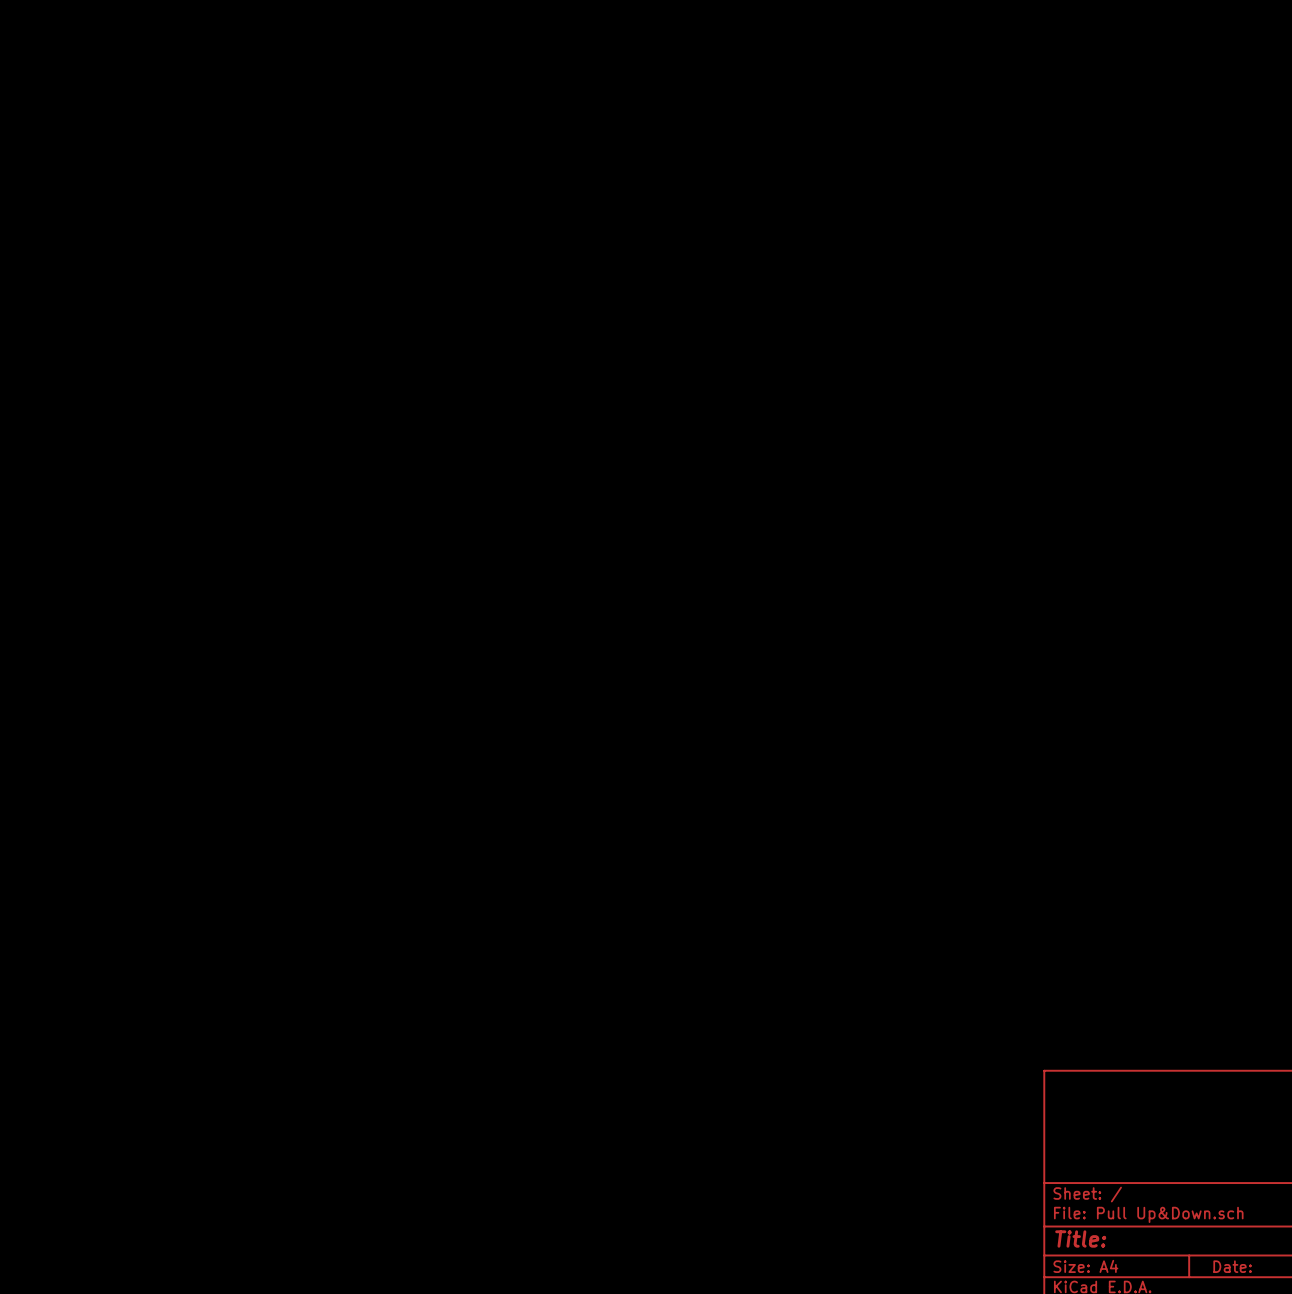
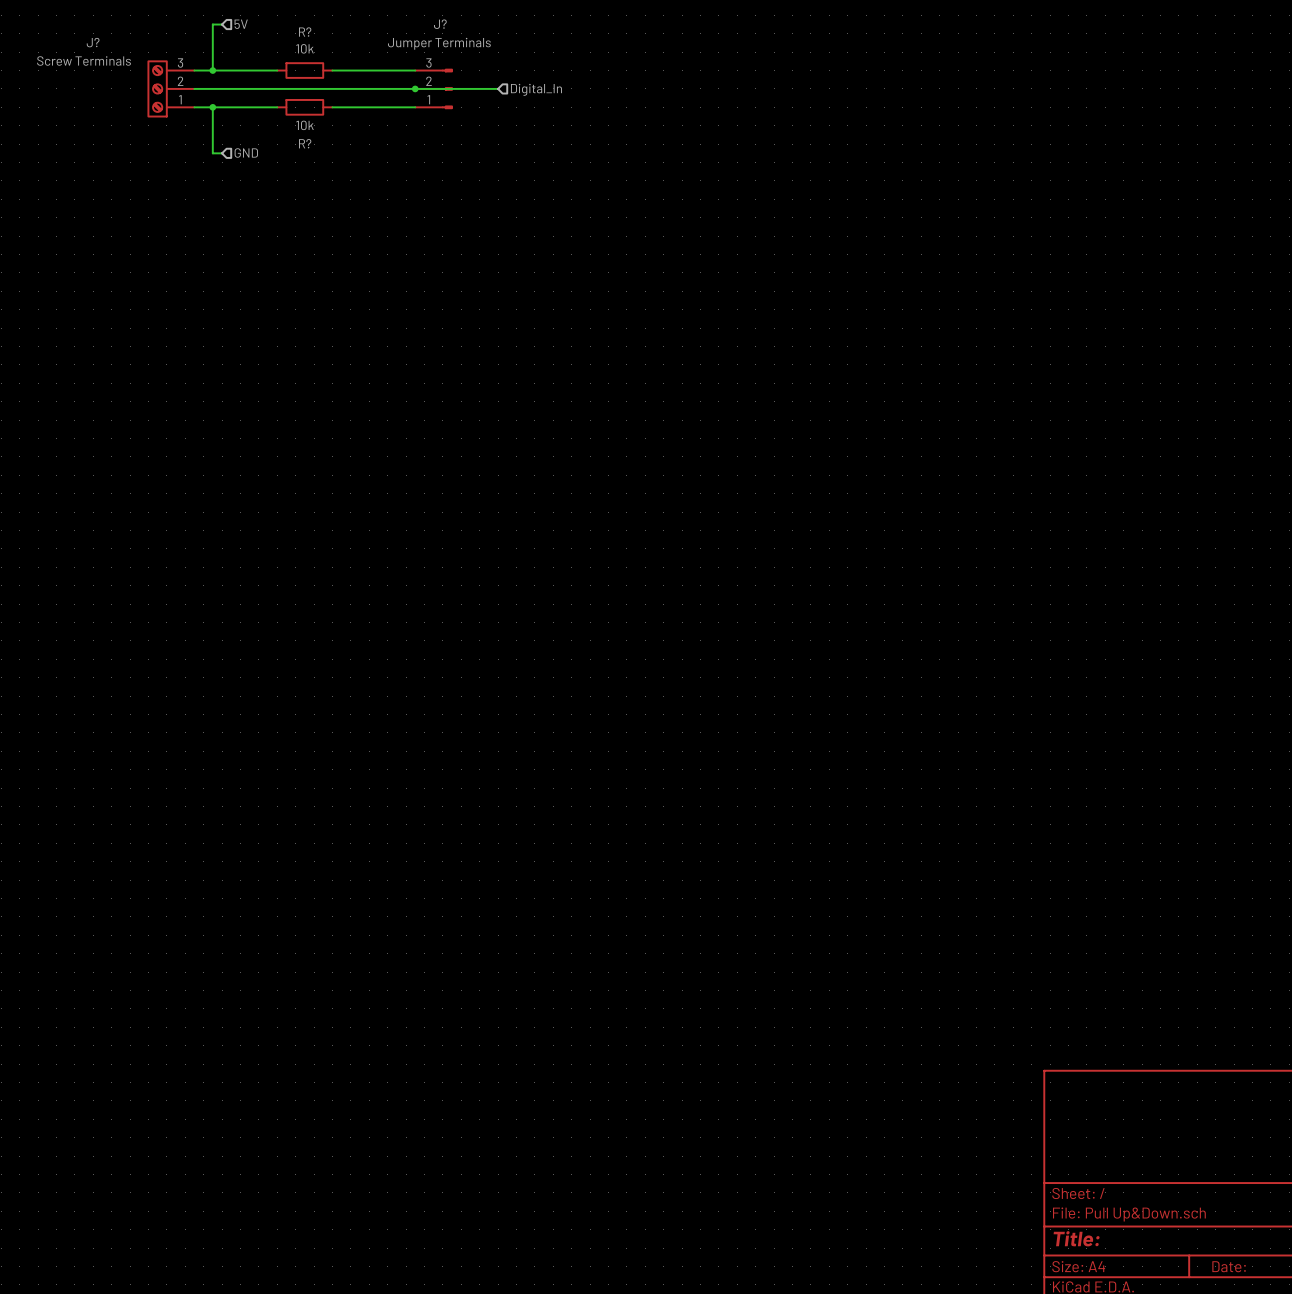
wire: none -> (222, 24) (212, 24) (212, 70)
hierarchical label: none -> 5V (241, 24)
wire: none -> (194, 70) (277, 70)
junction: none -> (212, 70)
R?: none -> 10k (304, 70)
wire: none -> (332, 70) (415, 70)
J?: none -> Screw Terminals (170, 88)
wire: none -> (194, 88) (498, 88)
junction: none -> (415, 88)
J?: none -> Jumper Terminals (433, 88)
hierarchical label: none -> Digital_In (536, 89)
wire: none -> (194, 107) (277, 107)
wire: none -> (212, 107) (212, 153) (222, 153)
junction: none -> (212, 107)
R?: none -> 10k (304, 107)
wire: none -> (332, 107) (415, 107)
hierarchical label: none -> GND (246, 152)

